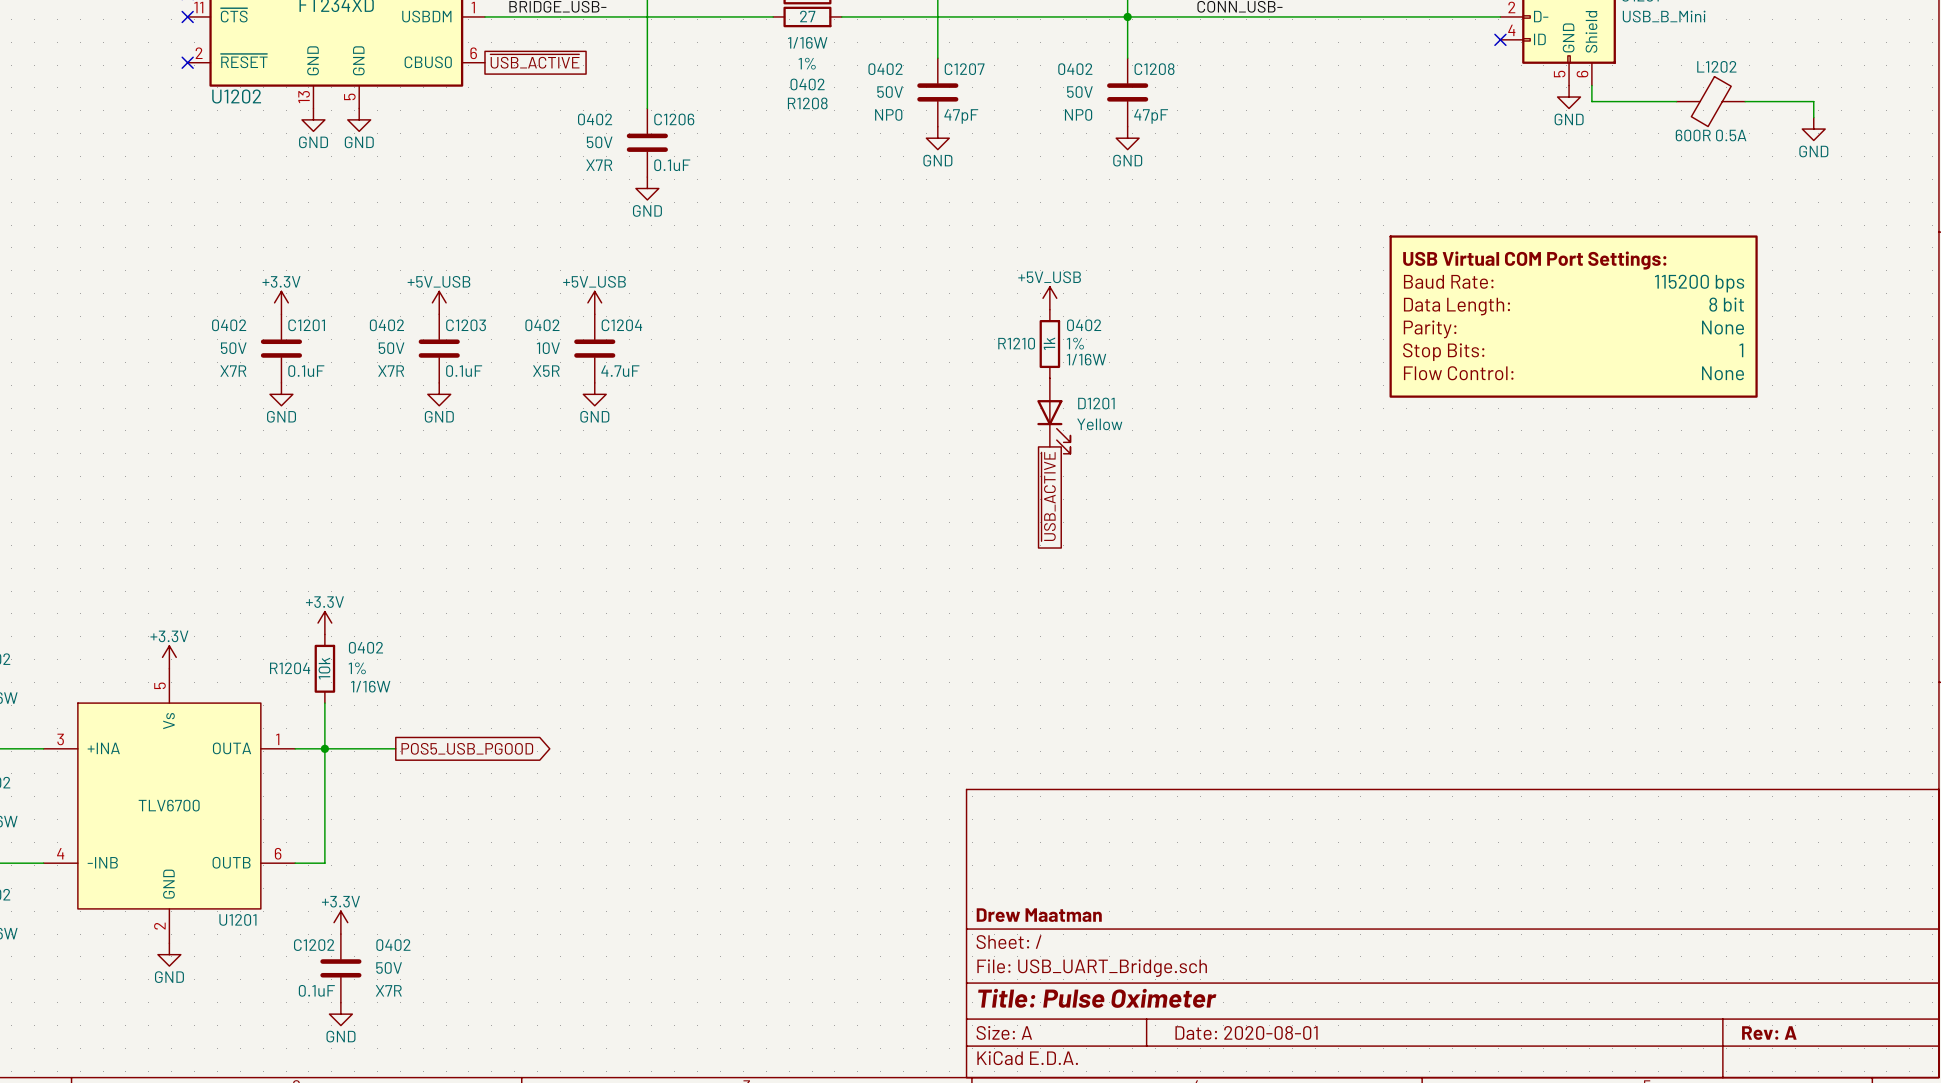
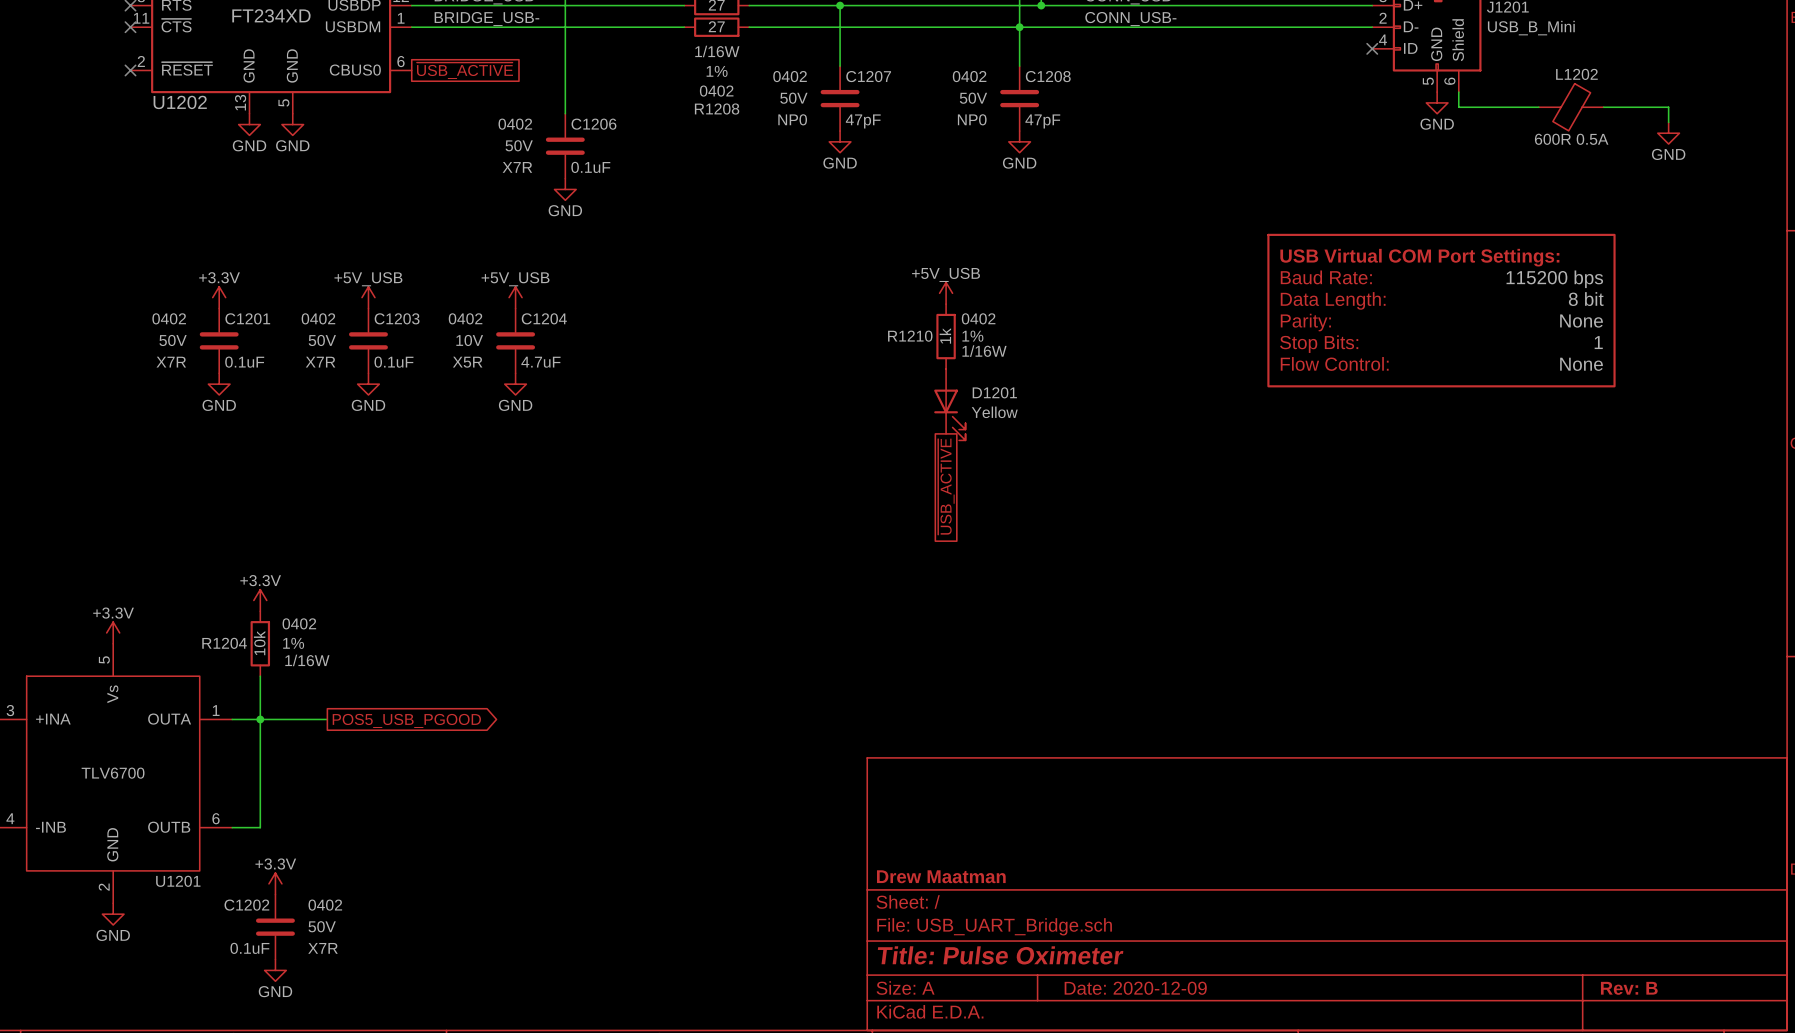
title block: Date: 2020-08-01 (1246, 1032) -> Date: 2020-12-09 (1135, 988)
title block: Rev: A (1769, 1033) -> Rev: B (1629, 988)

